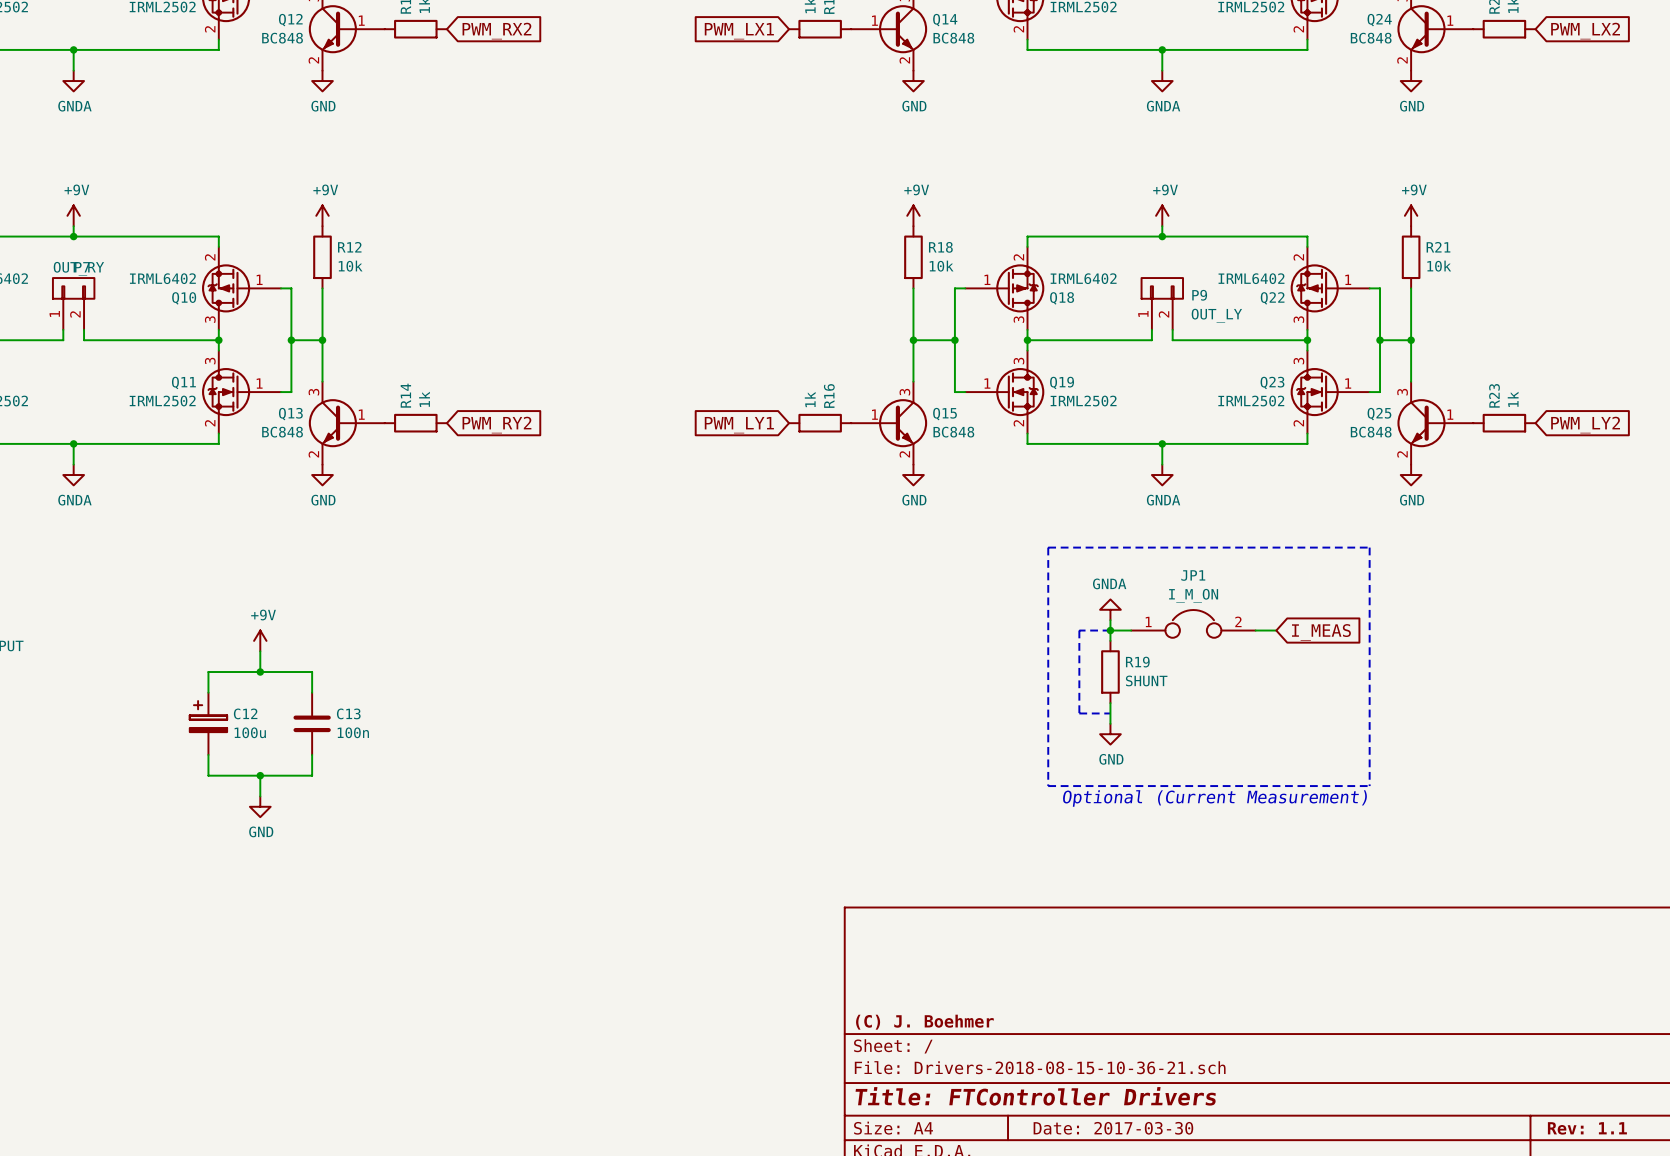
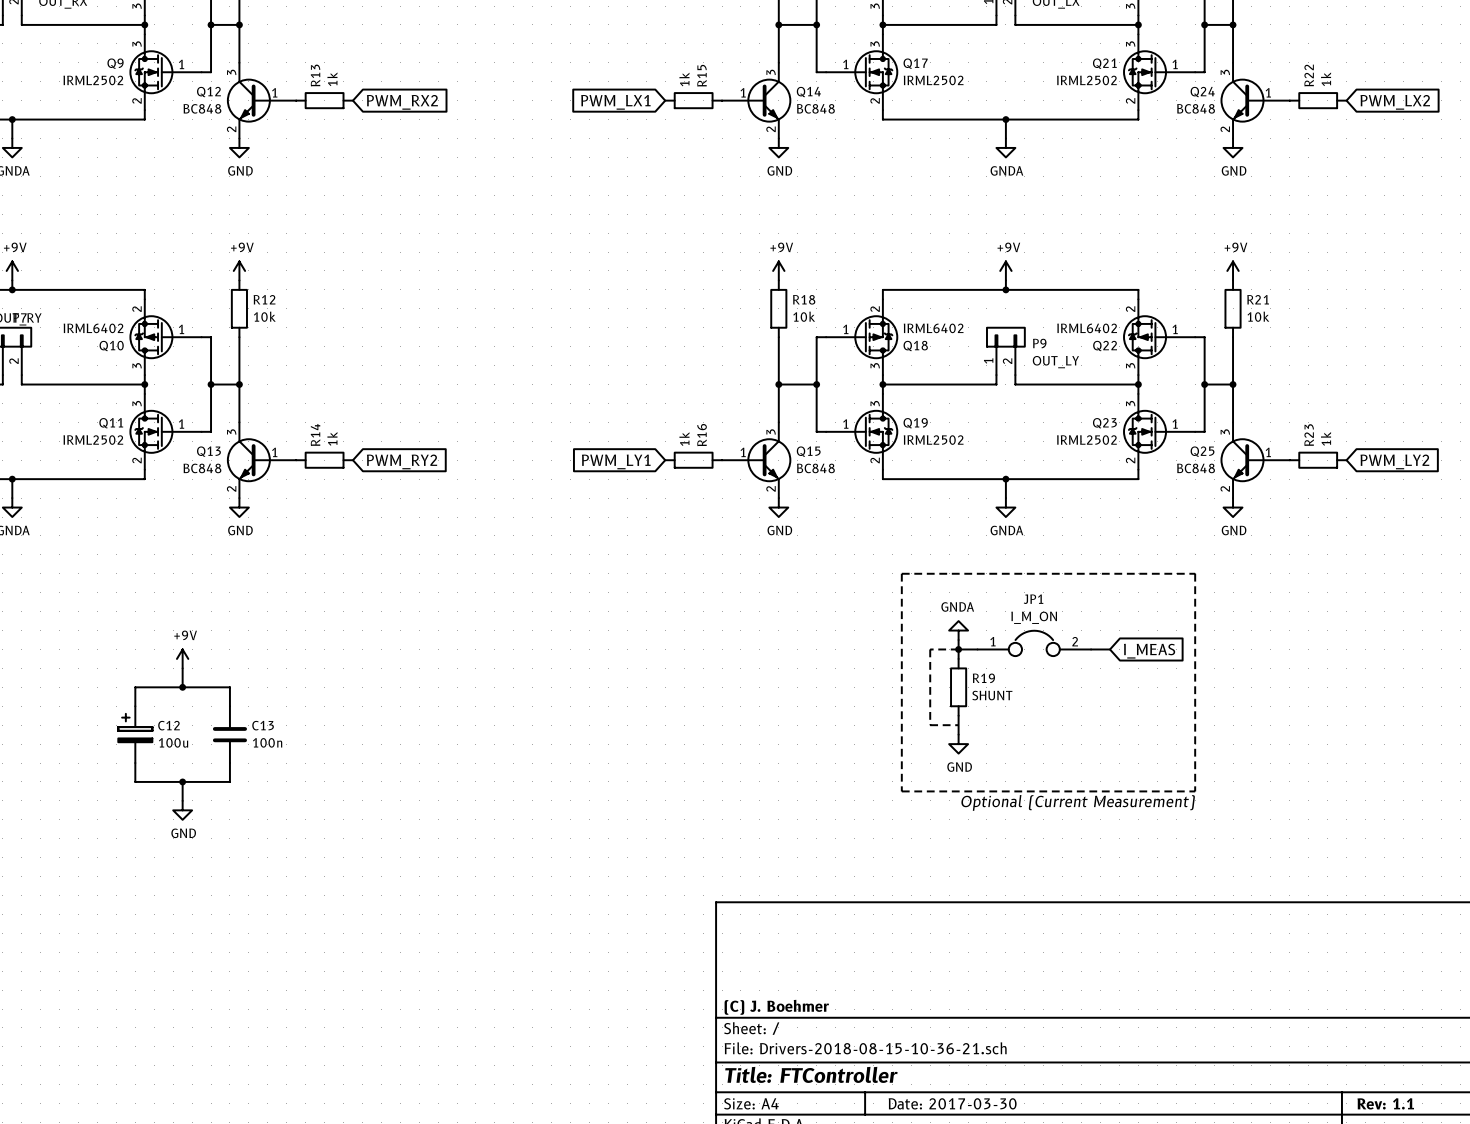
title block: Title: FTController Drivers (1035, 1096) -> Title: FTController (811, 1074)

